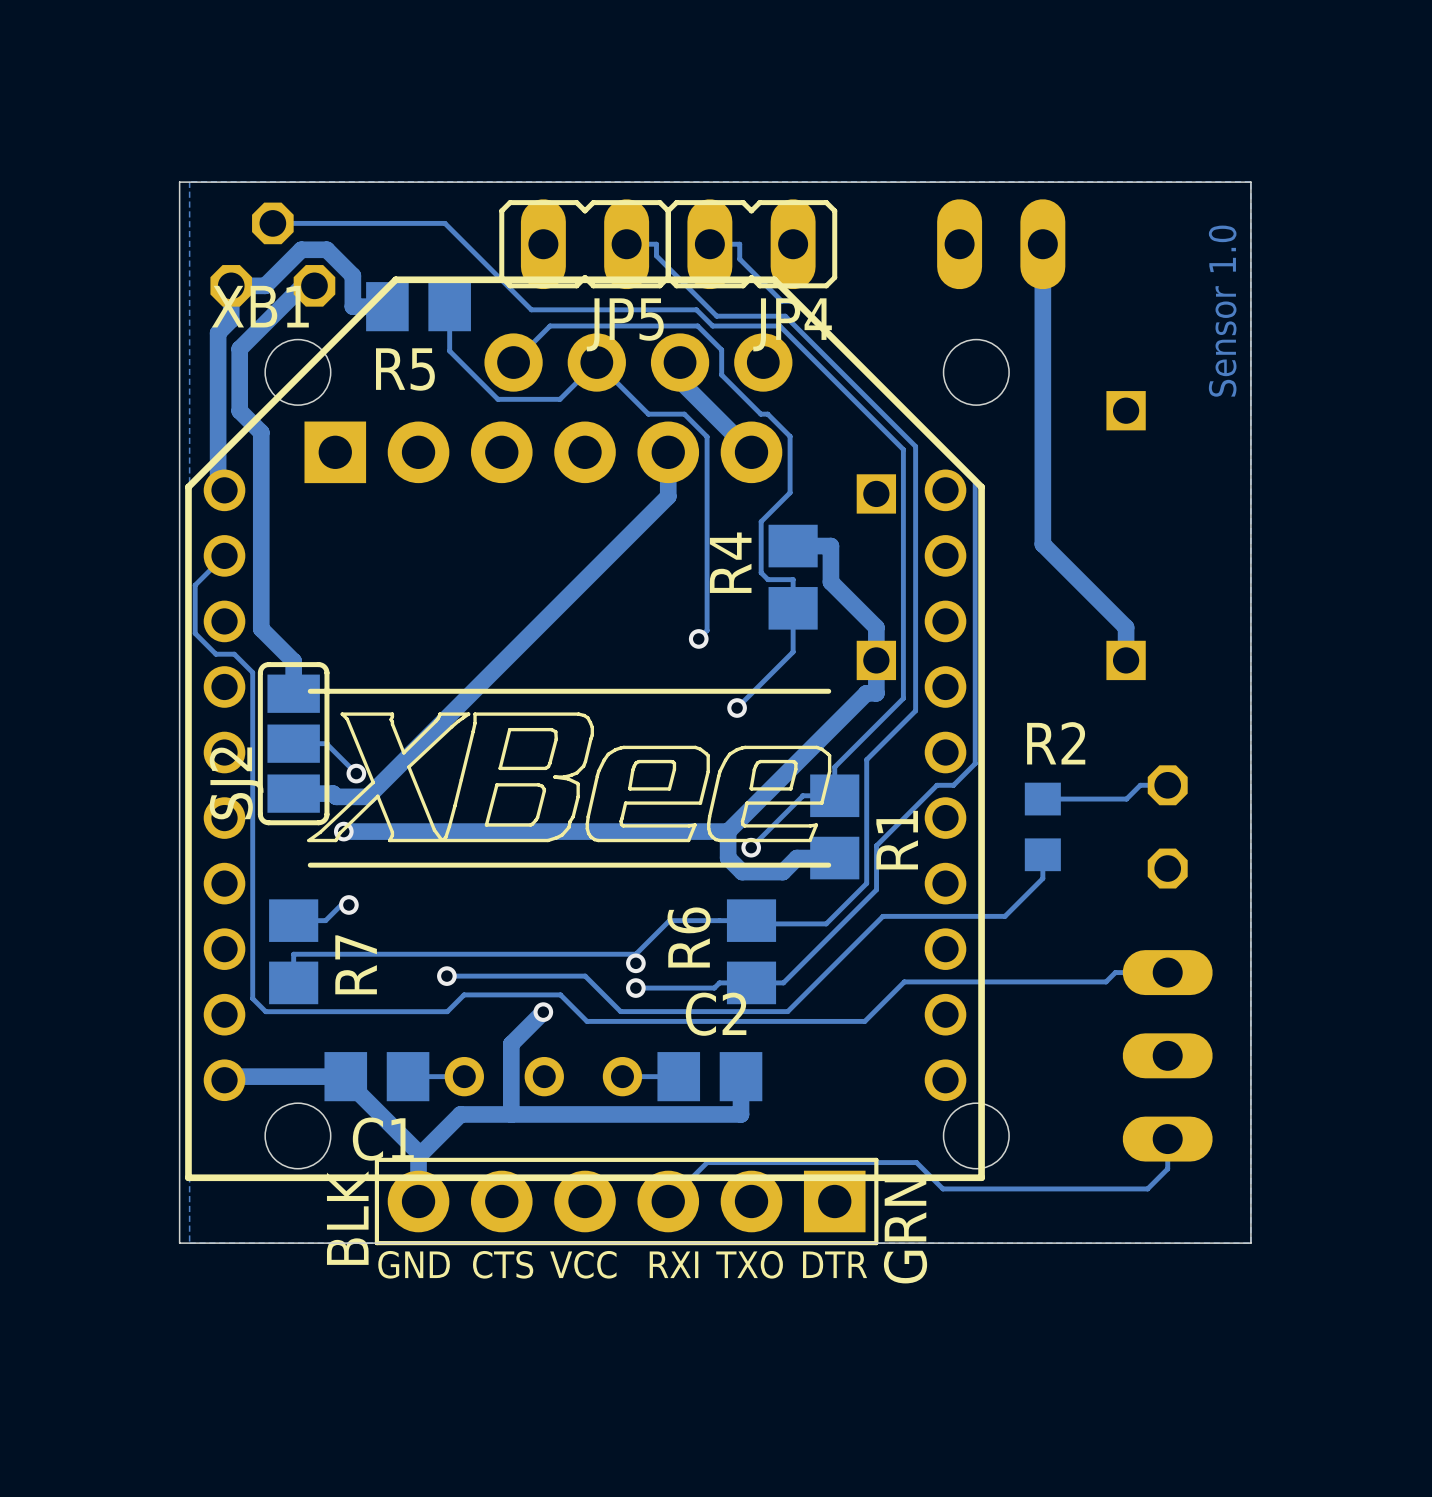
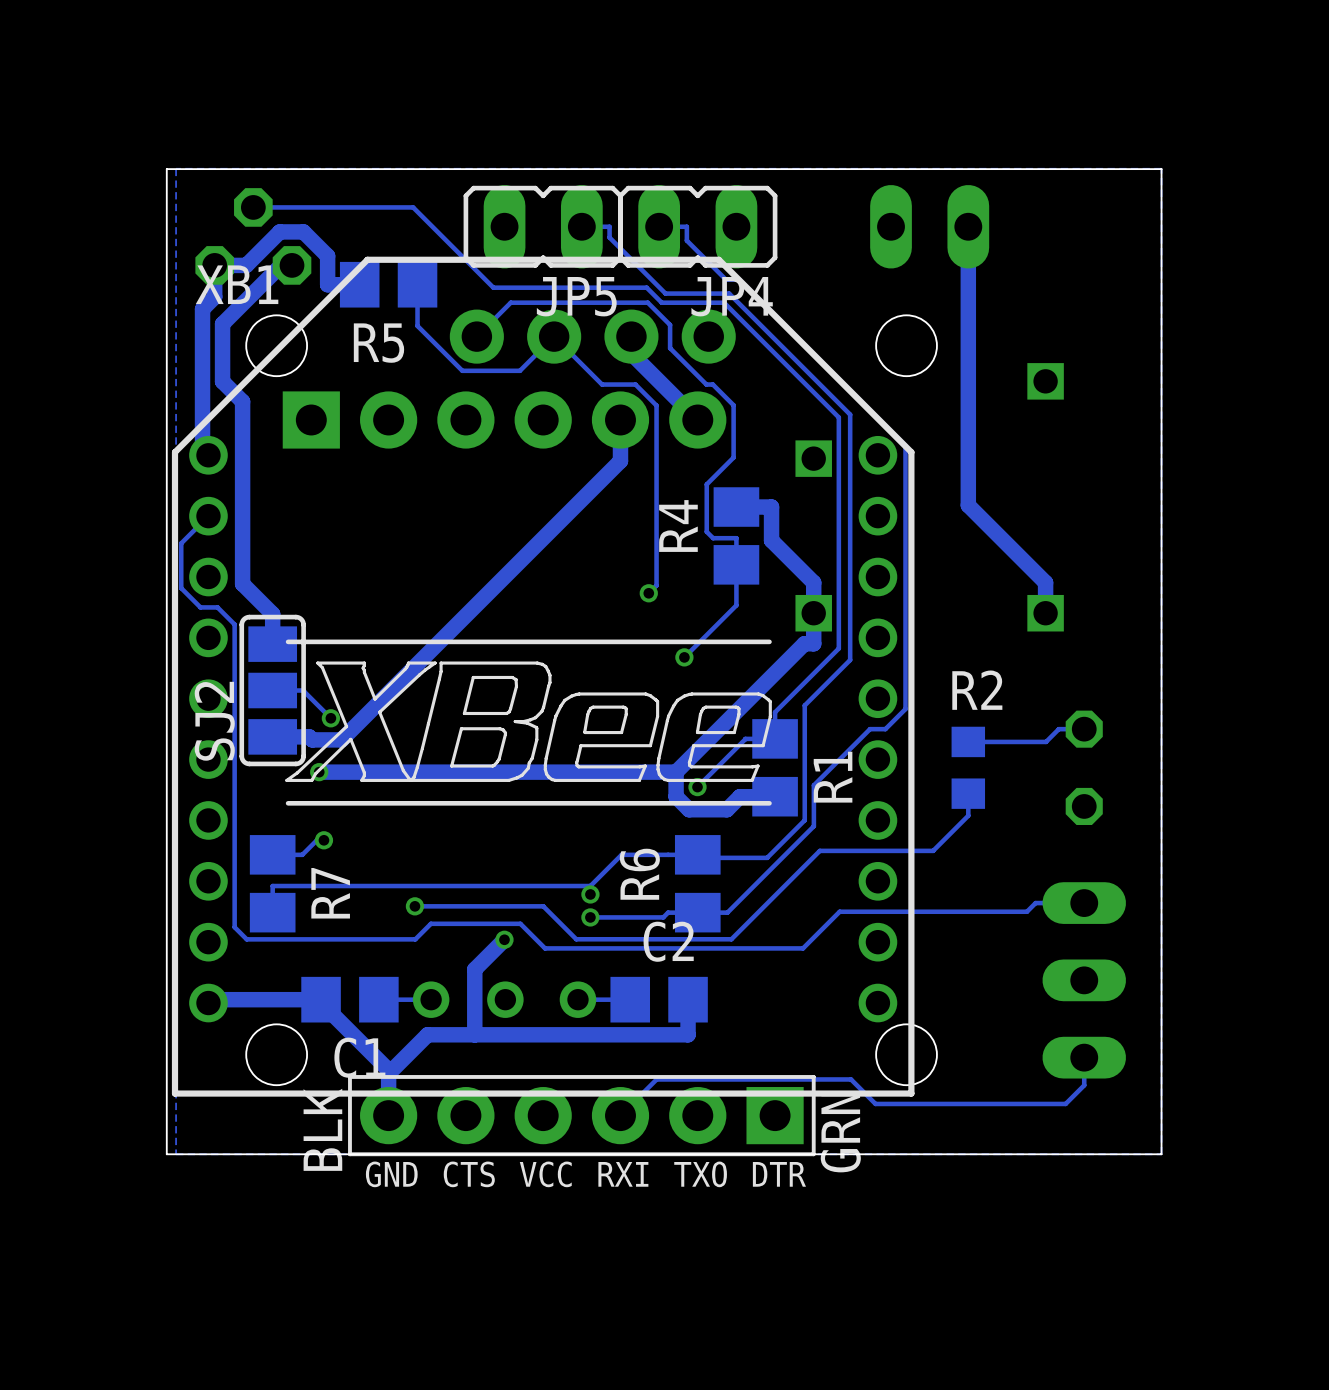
text: Sensor 1.0 (1222, 311) -> none

